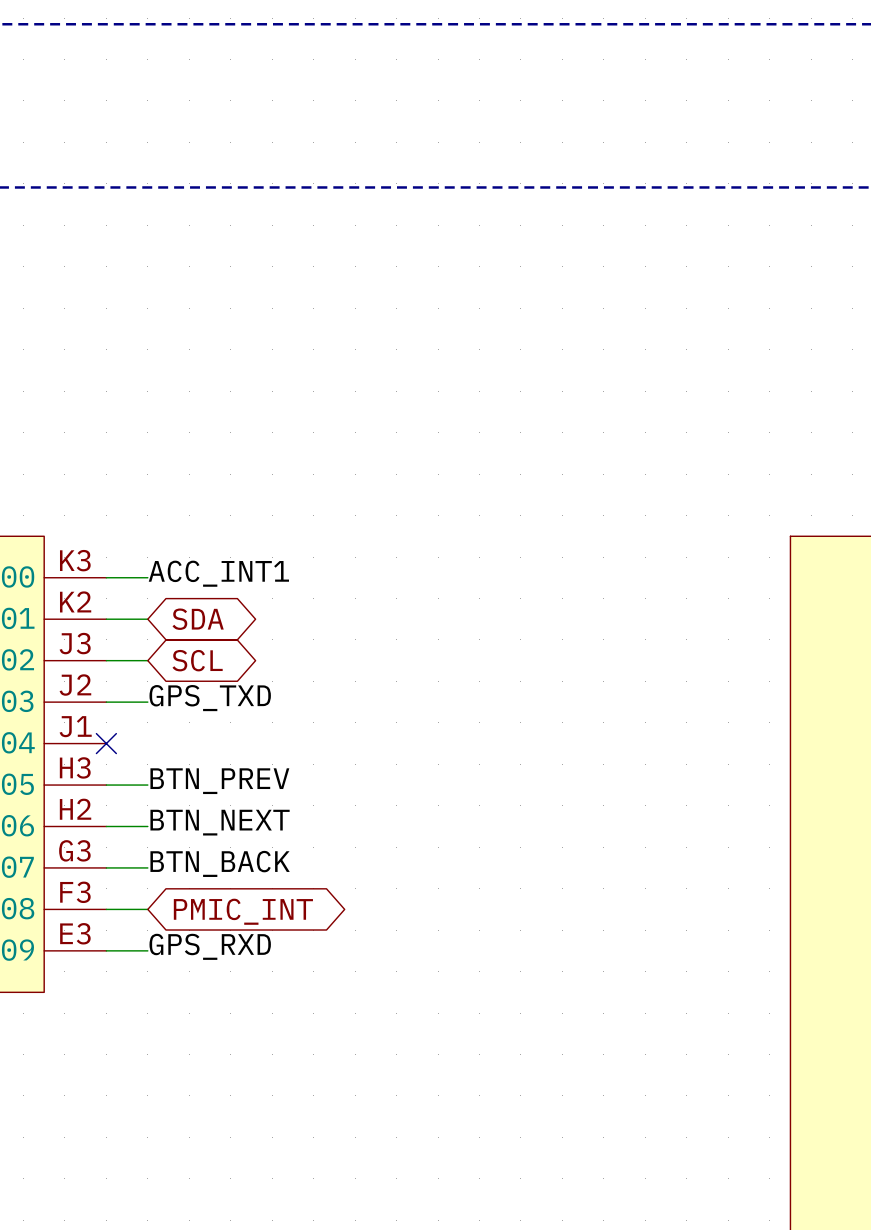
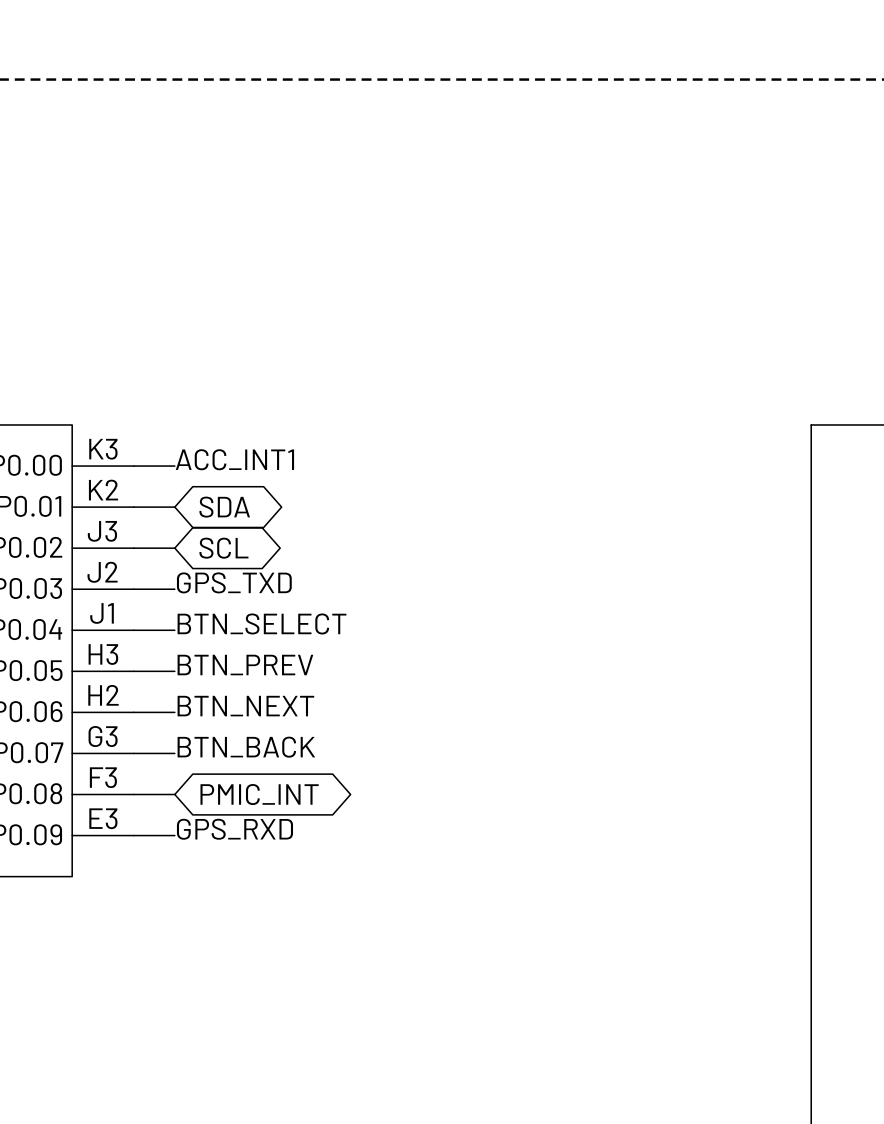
label: none -> BTN_SELECT (262, 623)
wire: none -> (133, 630) (174, 630)
no-connect mark: (106, 743) -> none

